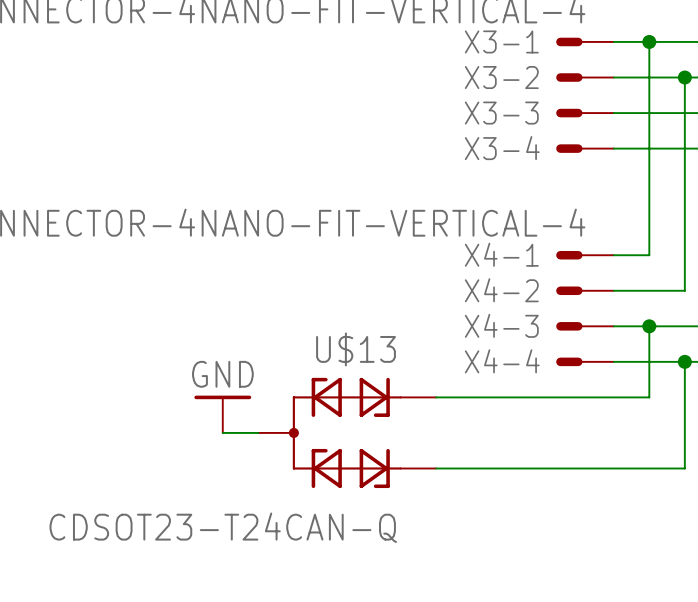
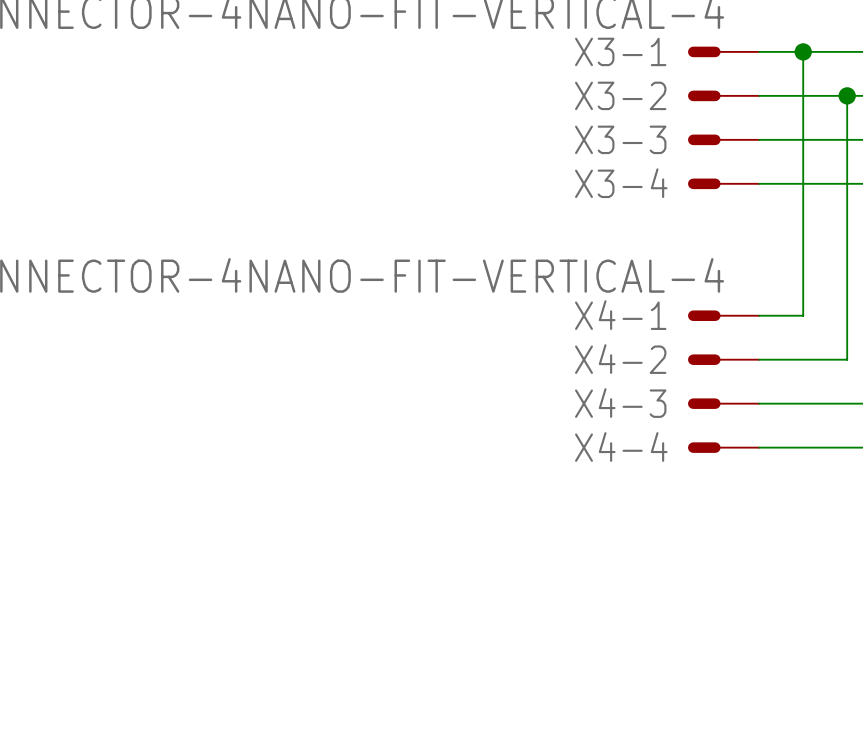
wire: (649, 326) (649, 397) (436, 397) -> none
junction: (649, 326) -> none
wire: (684, 361) (684, 468) (436, 468) -> none
junction: (684, 361) -> none
power symbol: GND (222, 414) -> none
wire: (222, 432) (258, 432) -> none
U$13: CDSOT23-T24CAN-Q (347, 432) -> none

